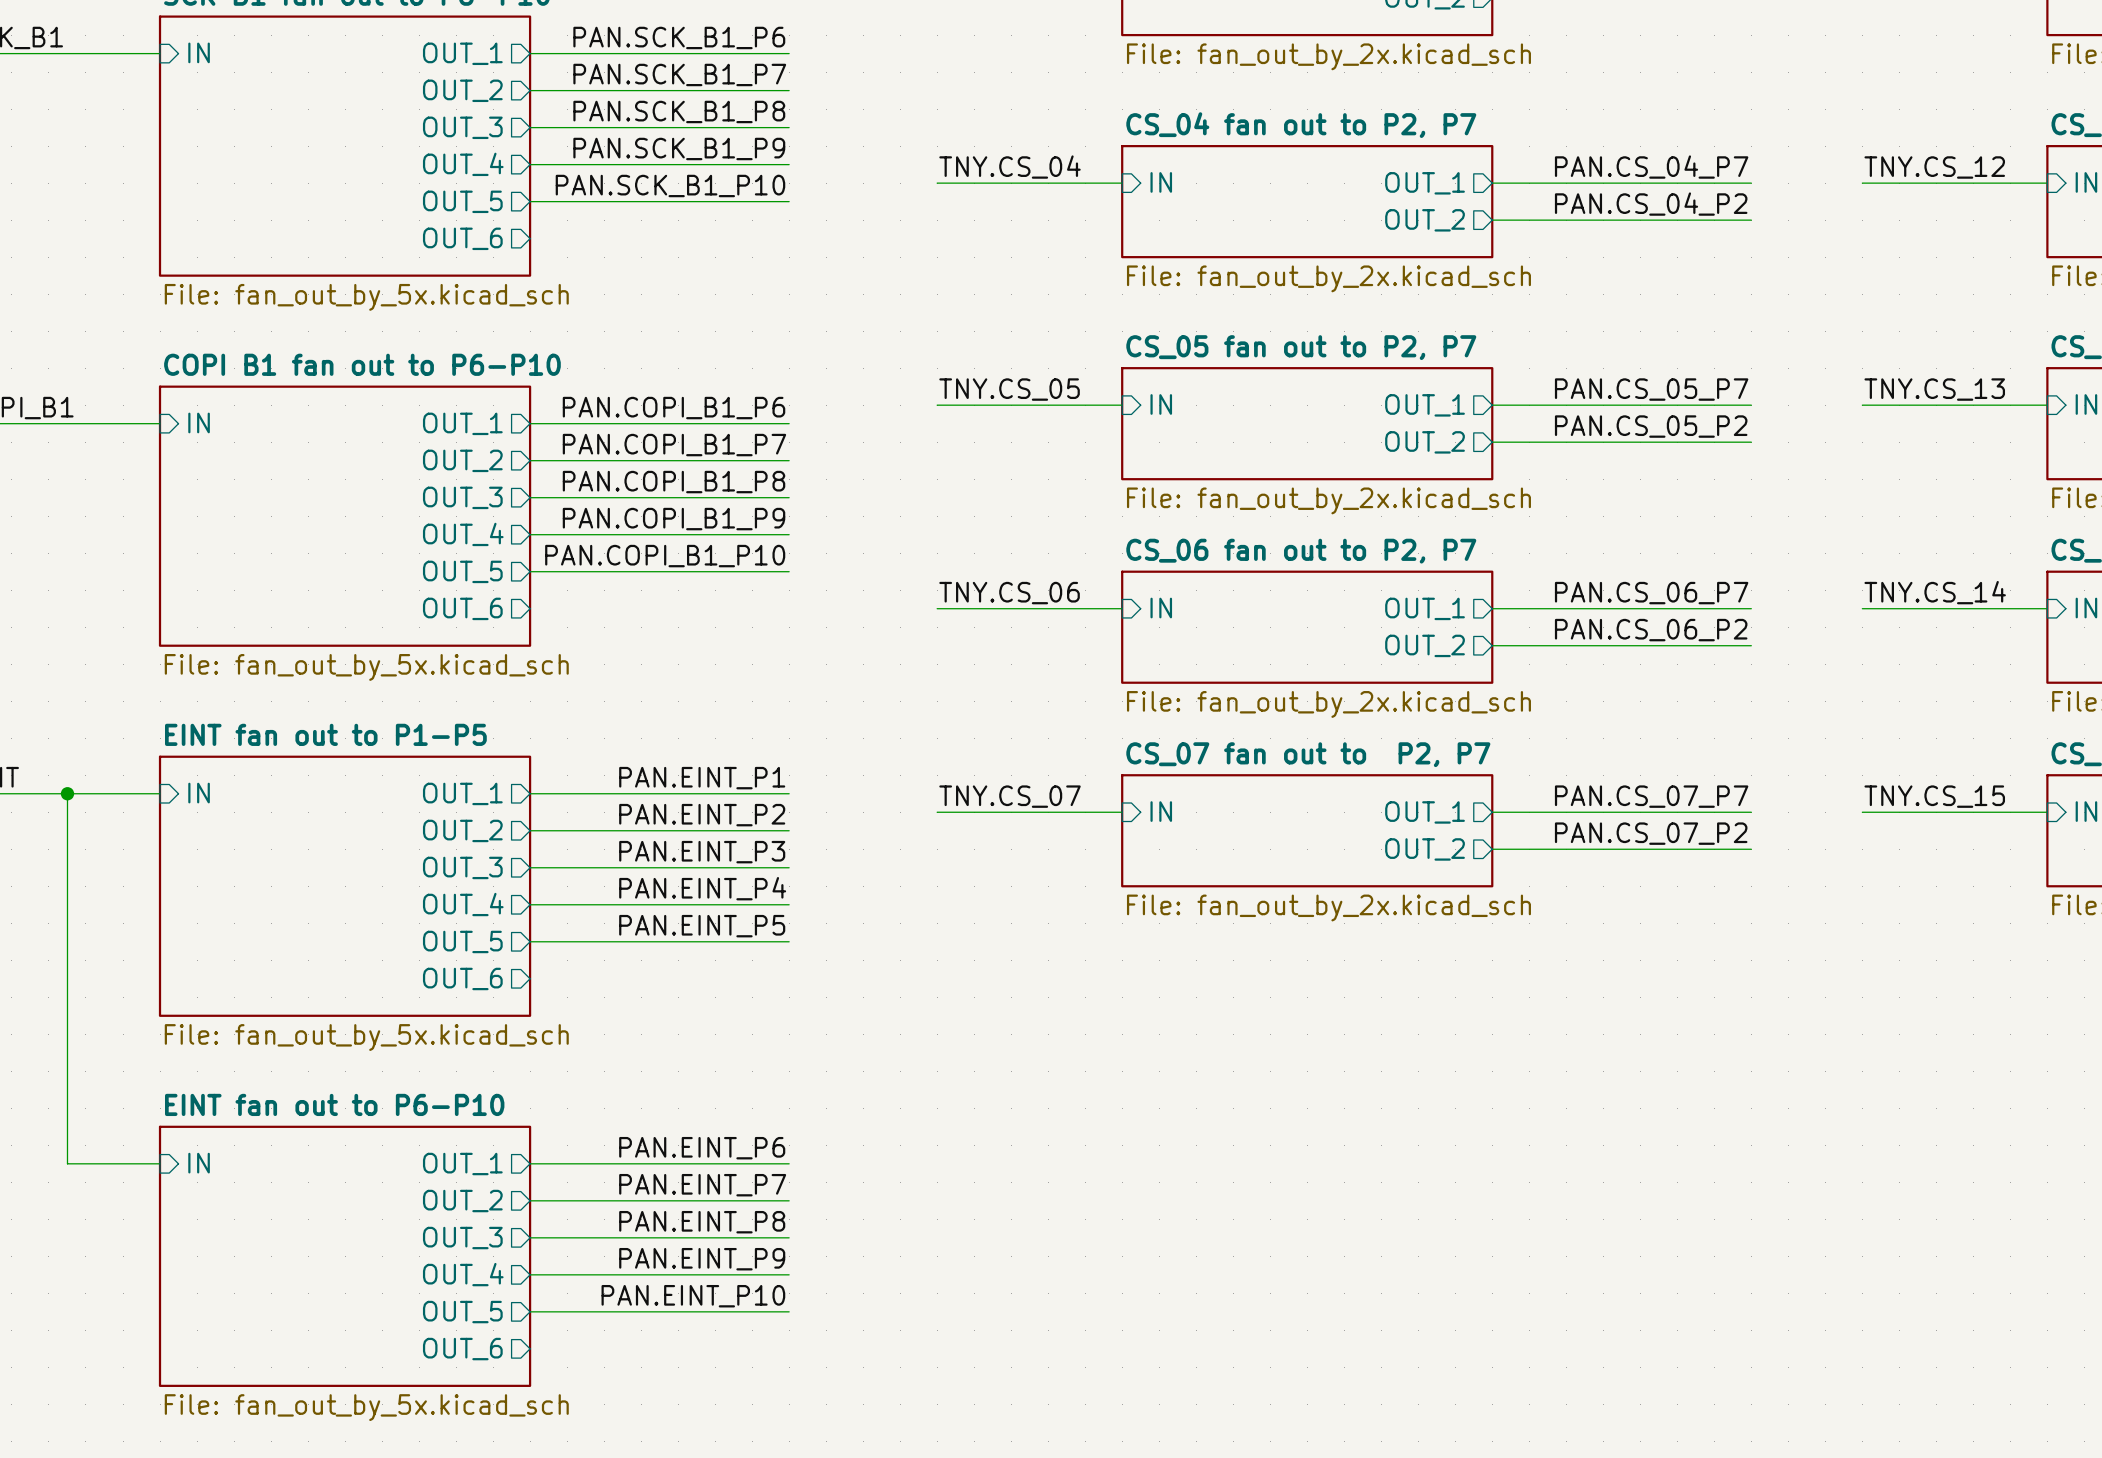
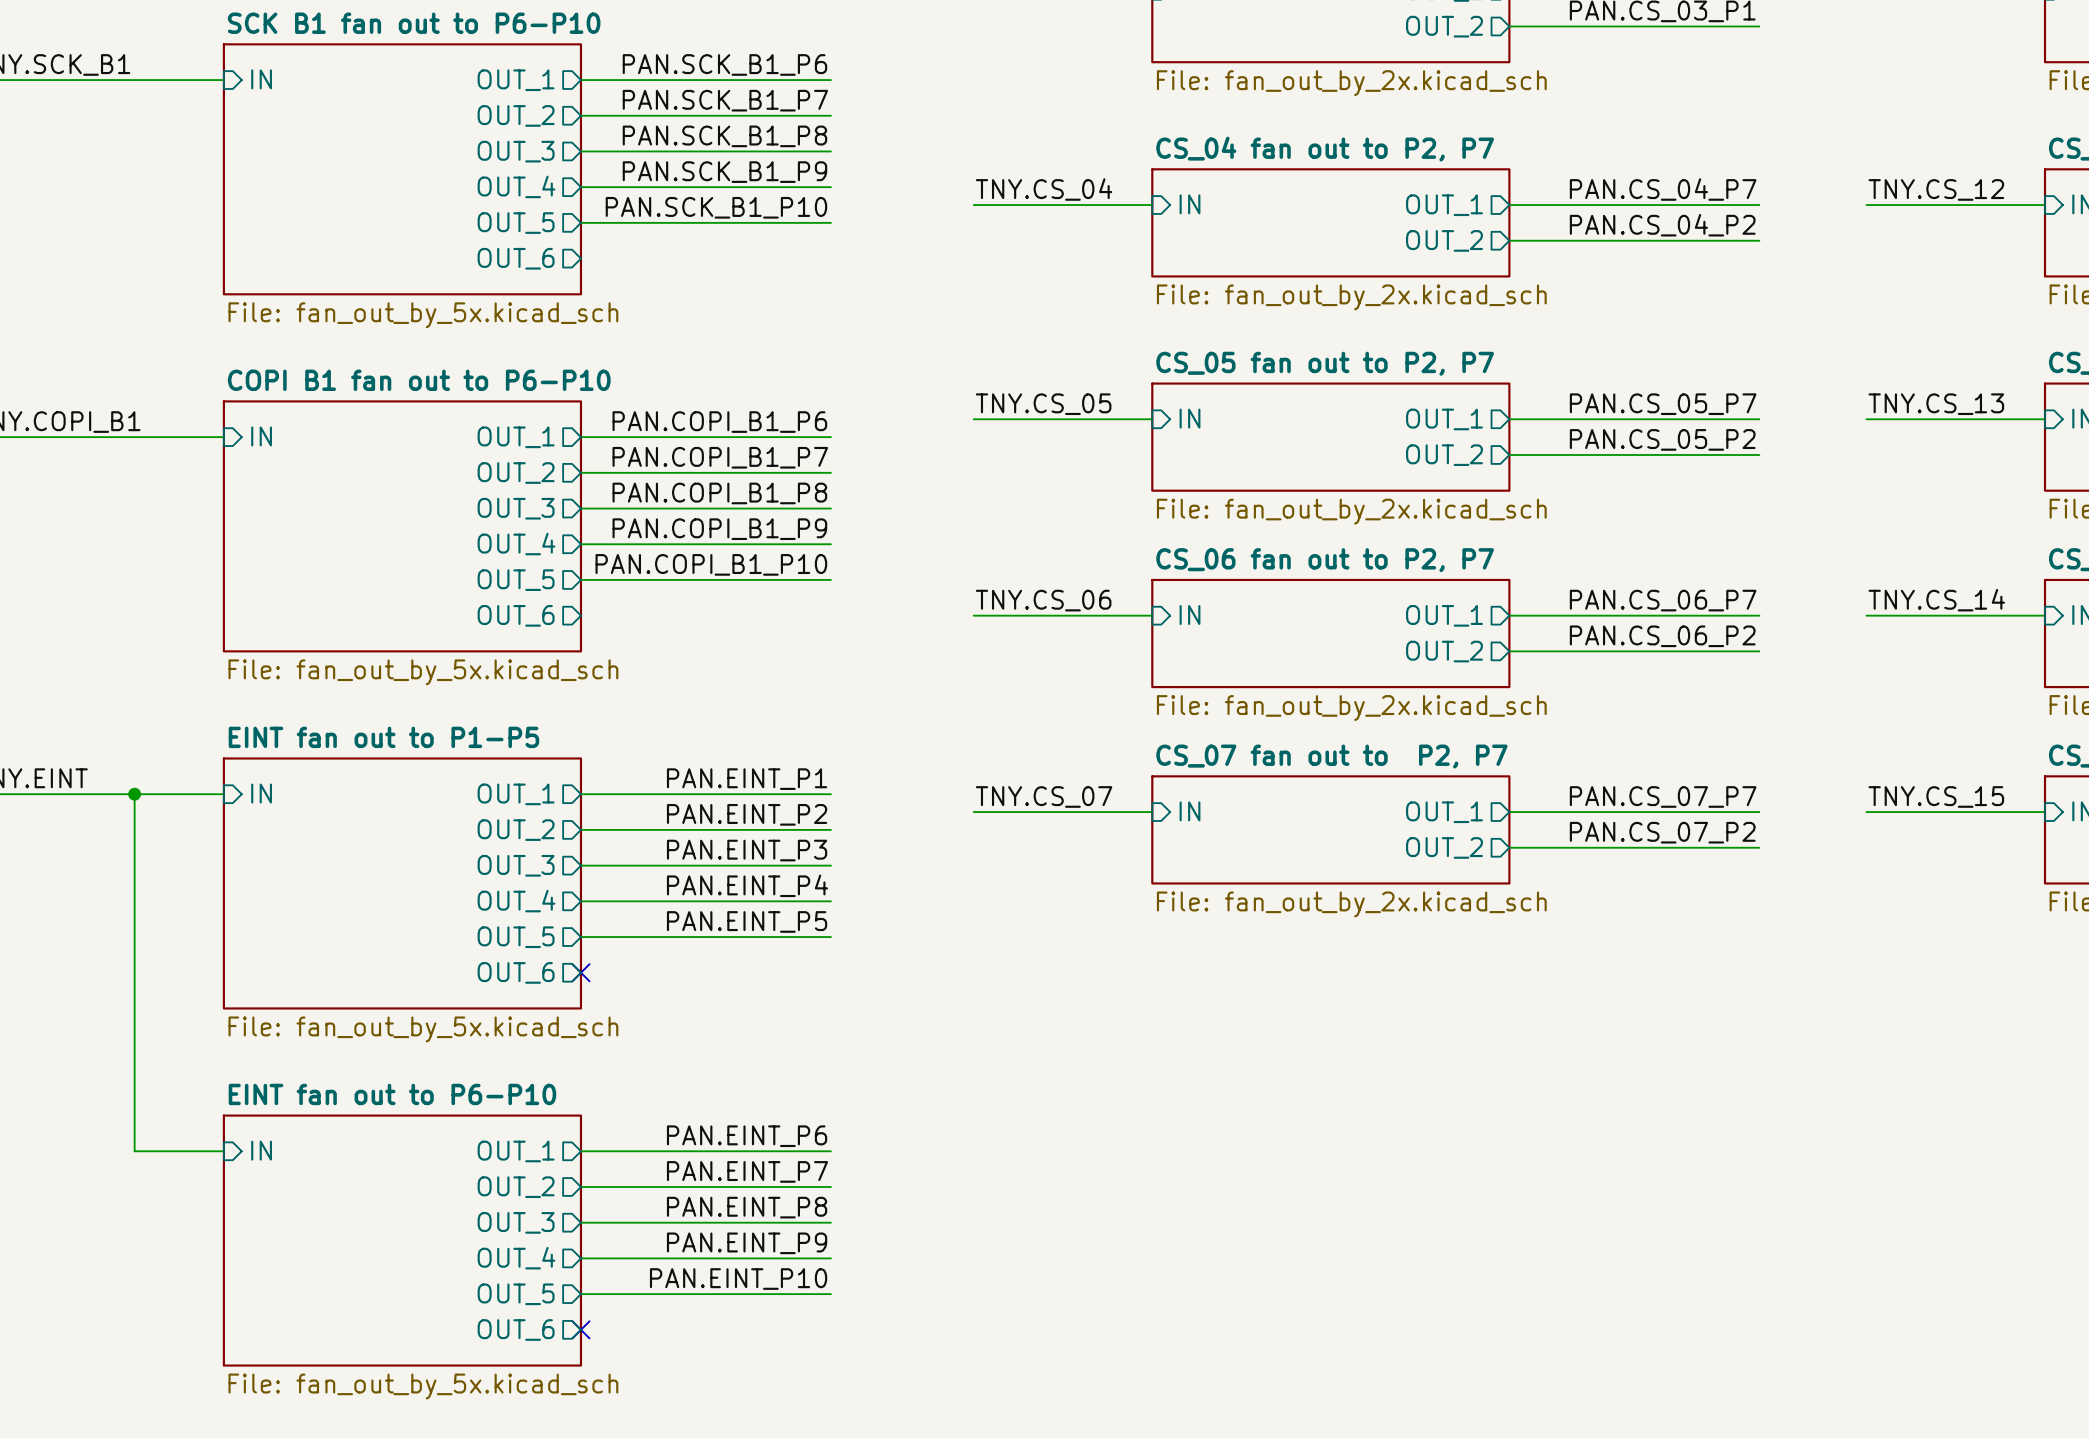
no-connect mark: none -> (580, 972)
no-connect mark: none -> (580, 1329)

